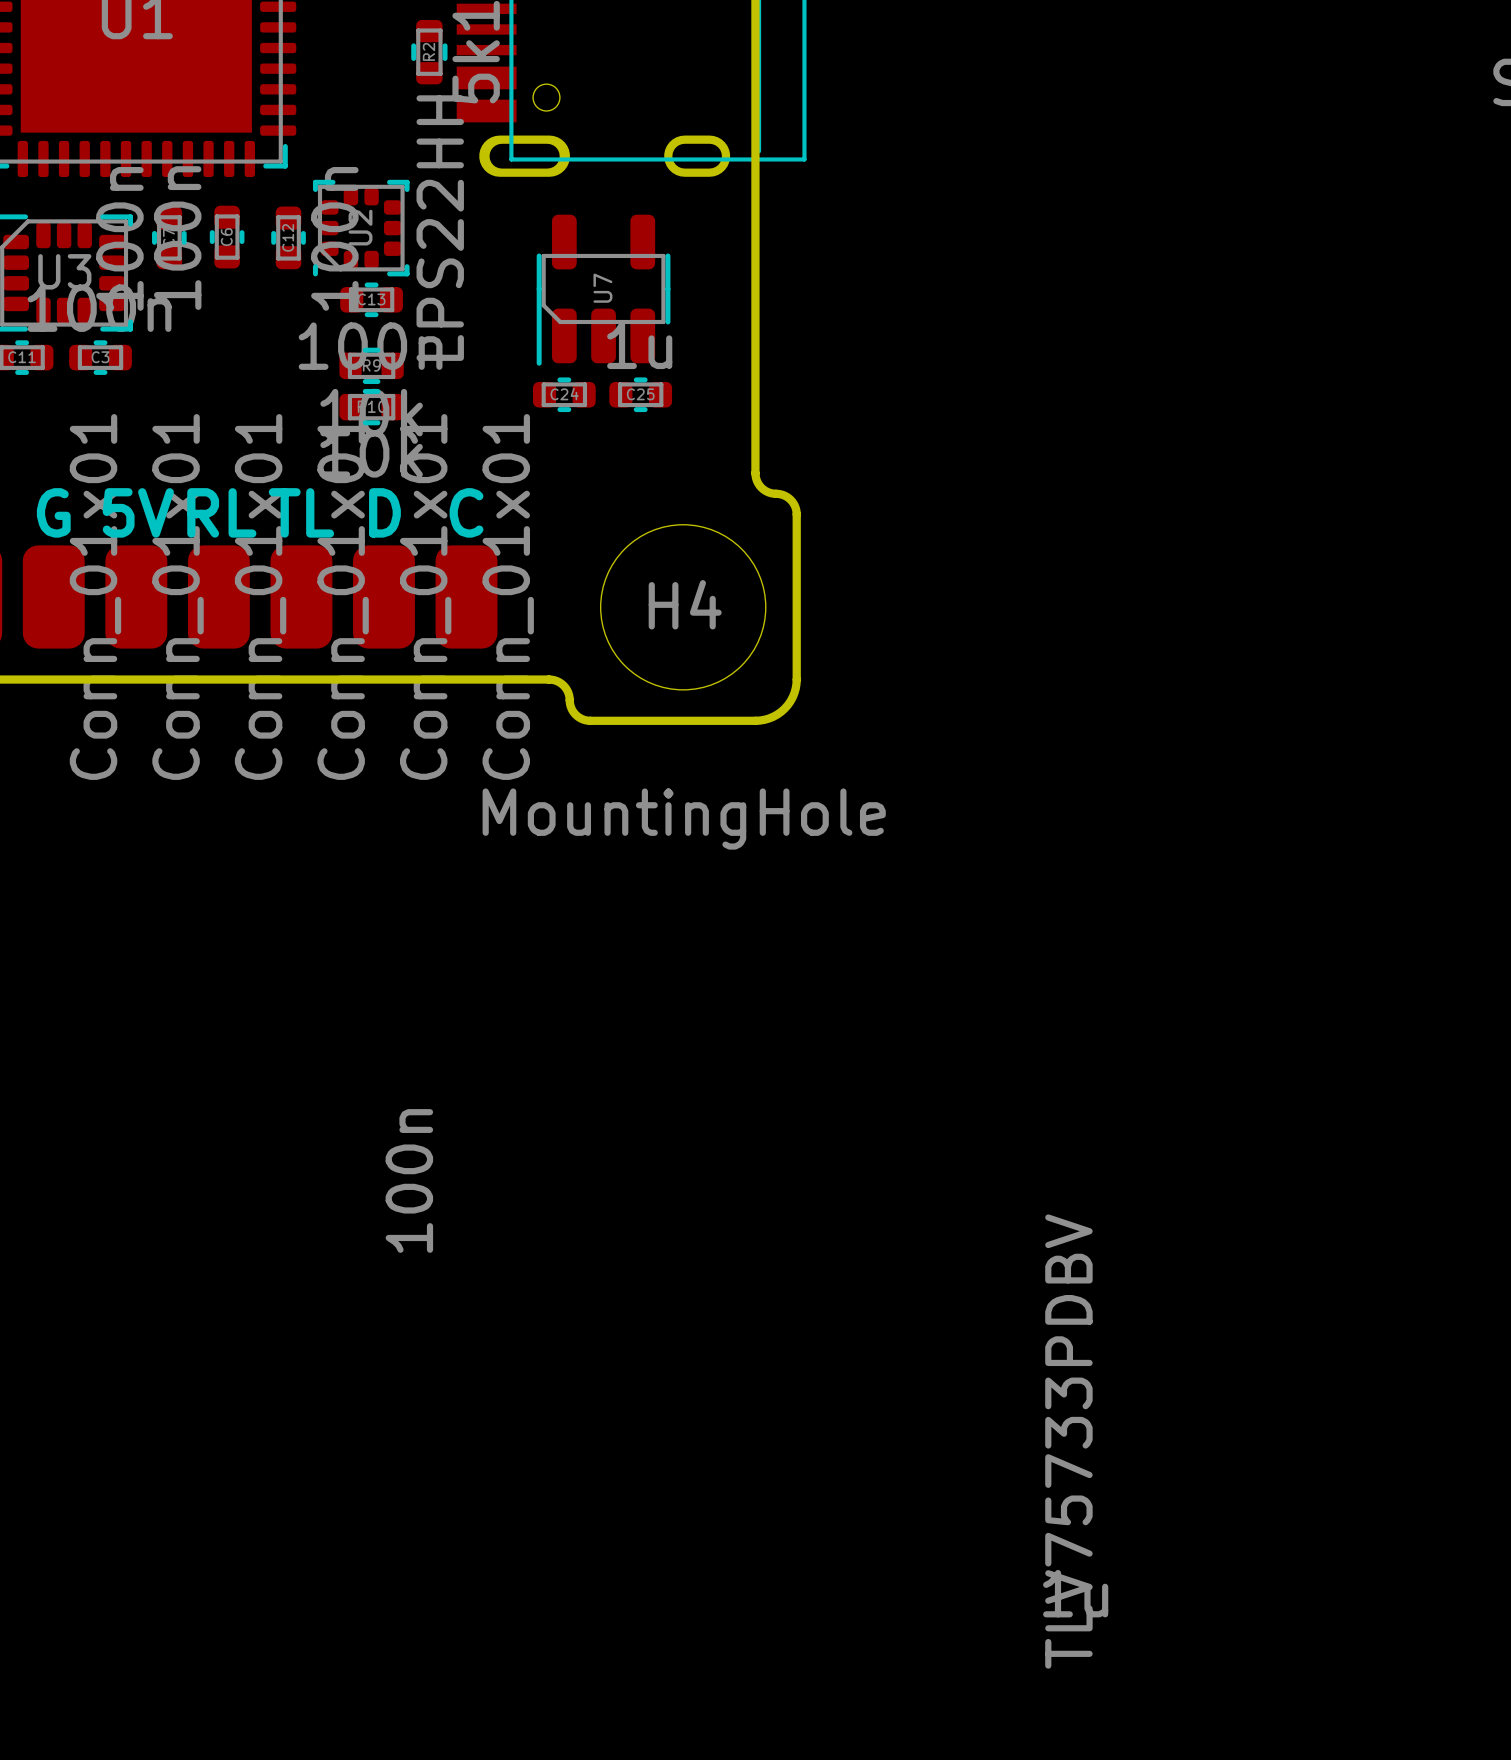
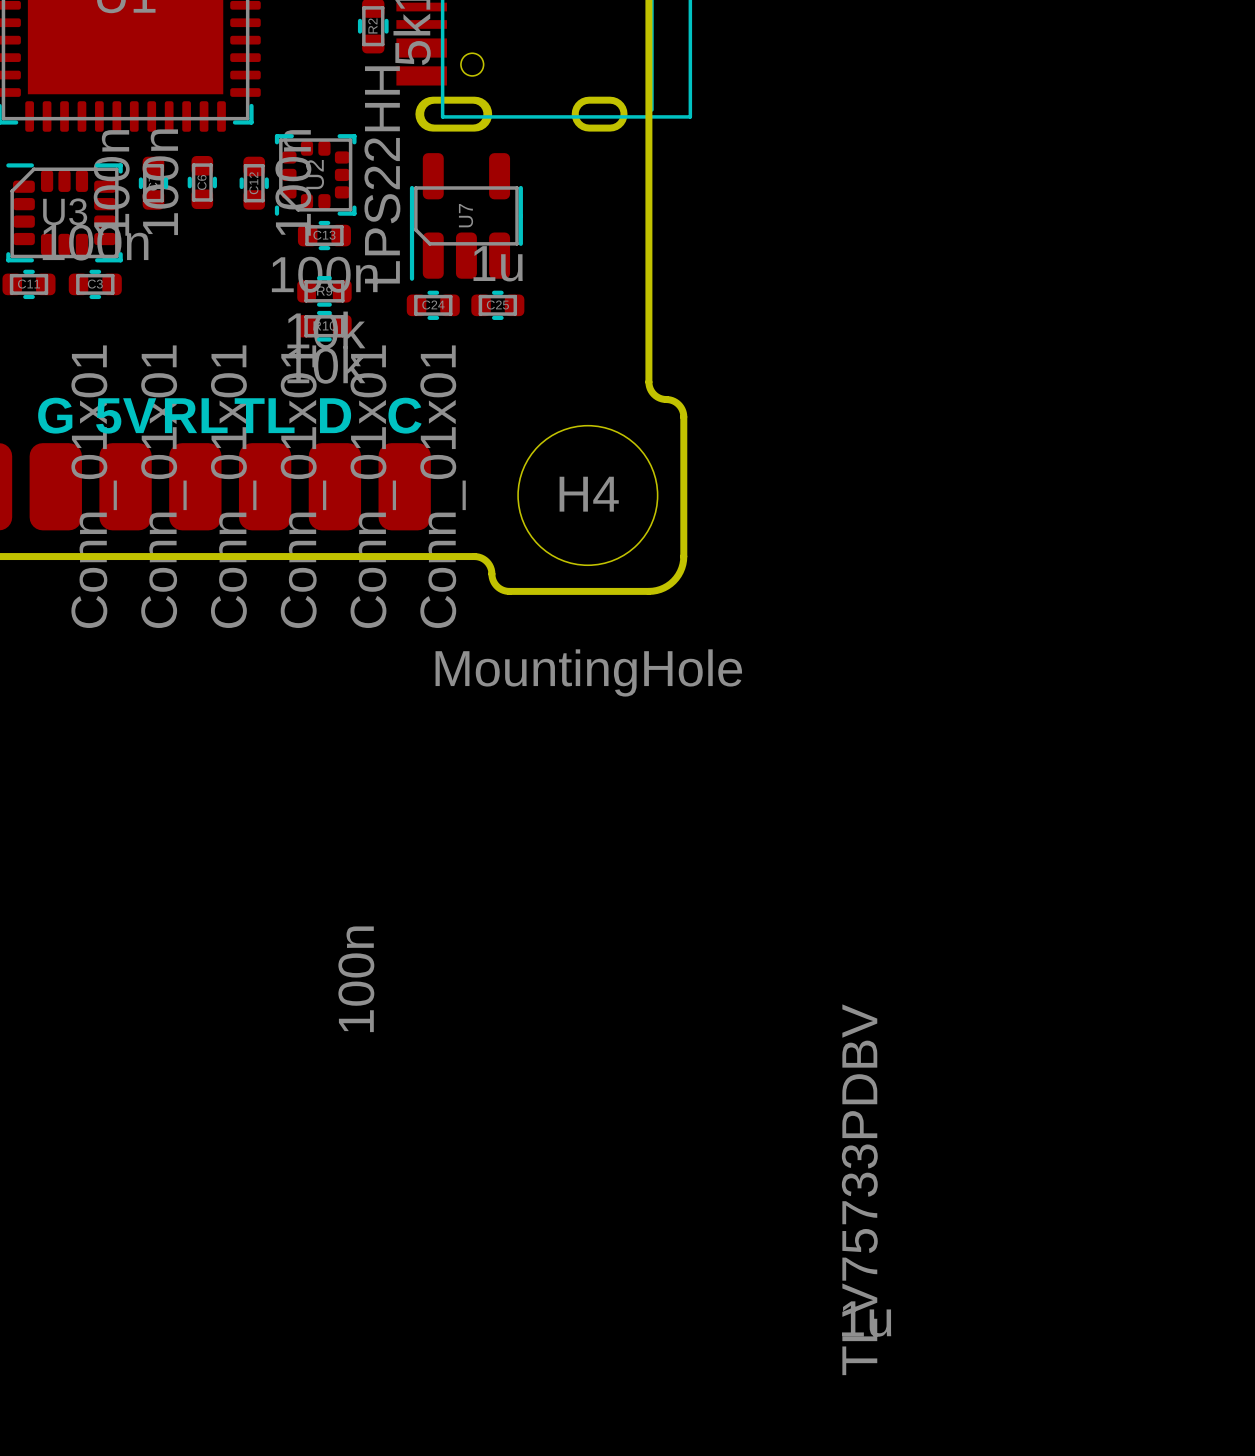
U7 position: (603, 290) -> (466, 216)
C24 position: (564, 394) -> (433, 305)
C25 position: (640, 394) -> (497, 305)

